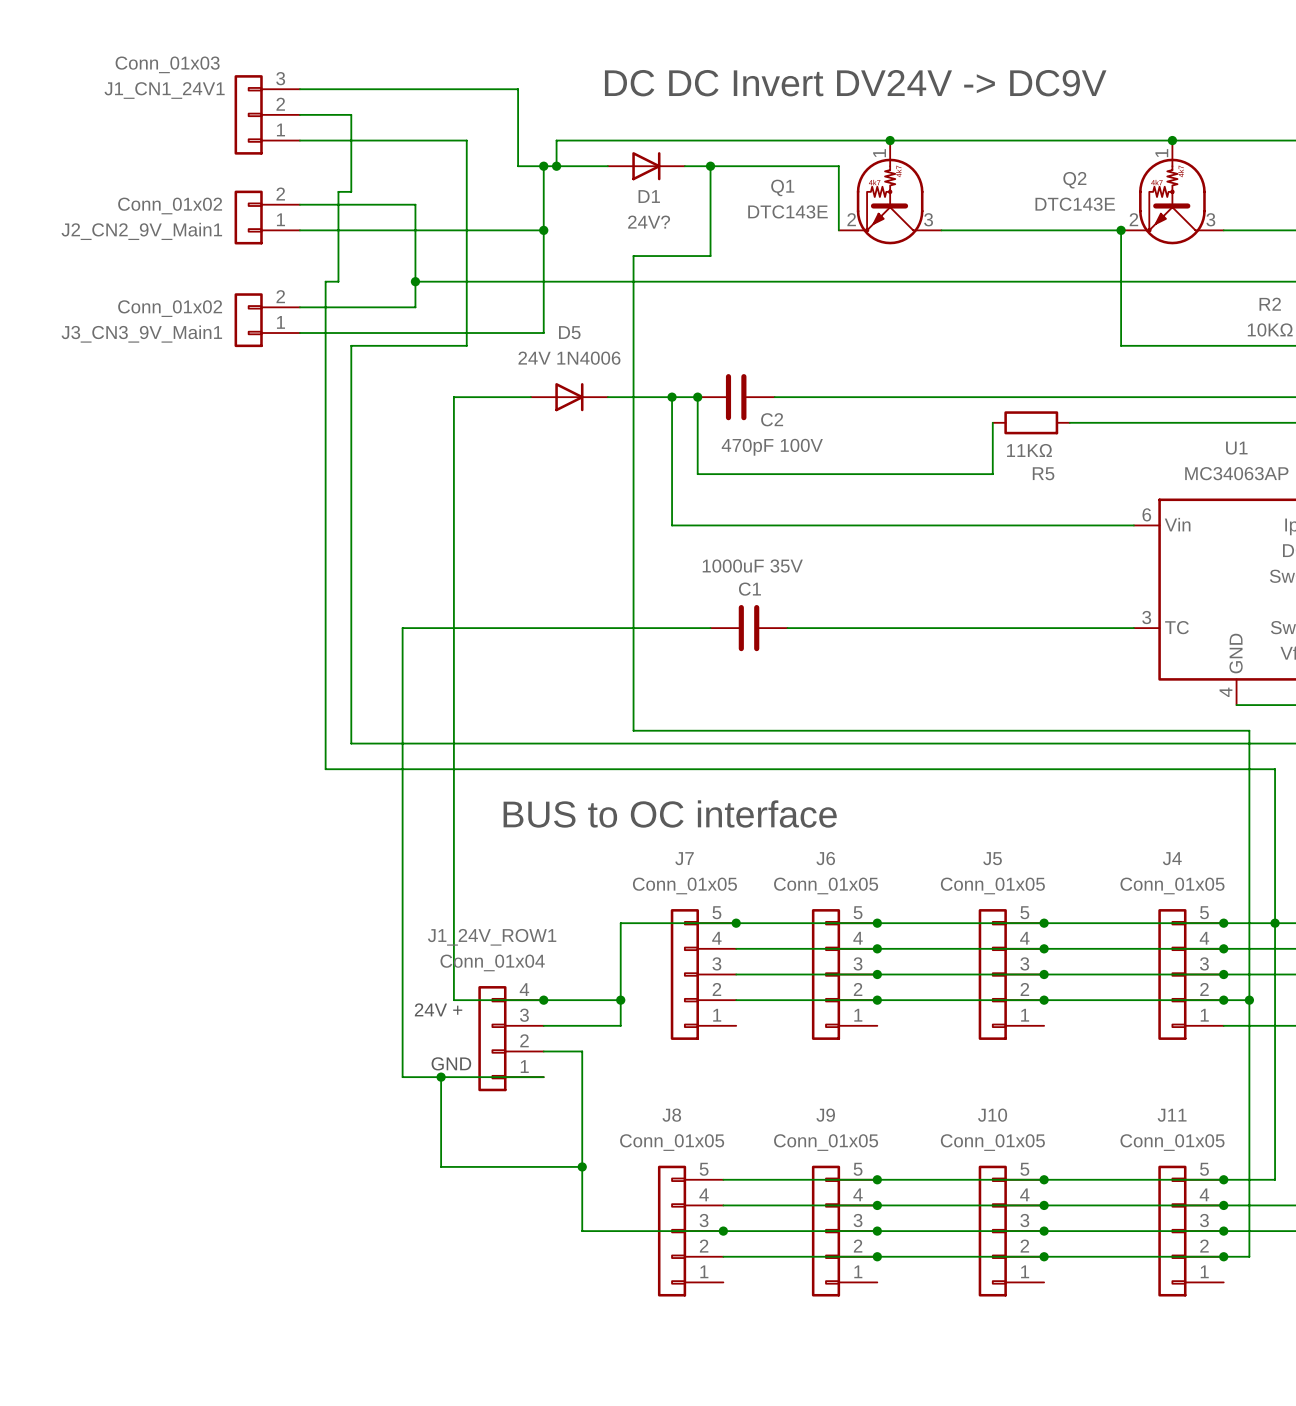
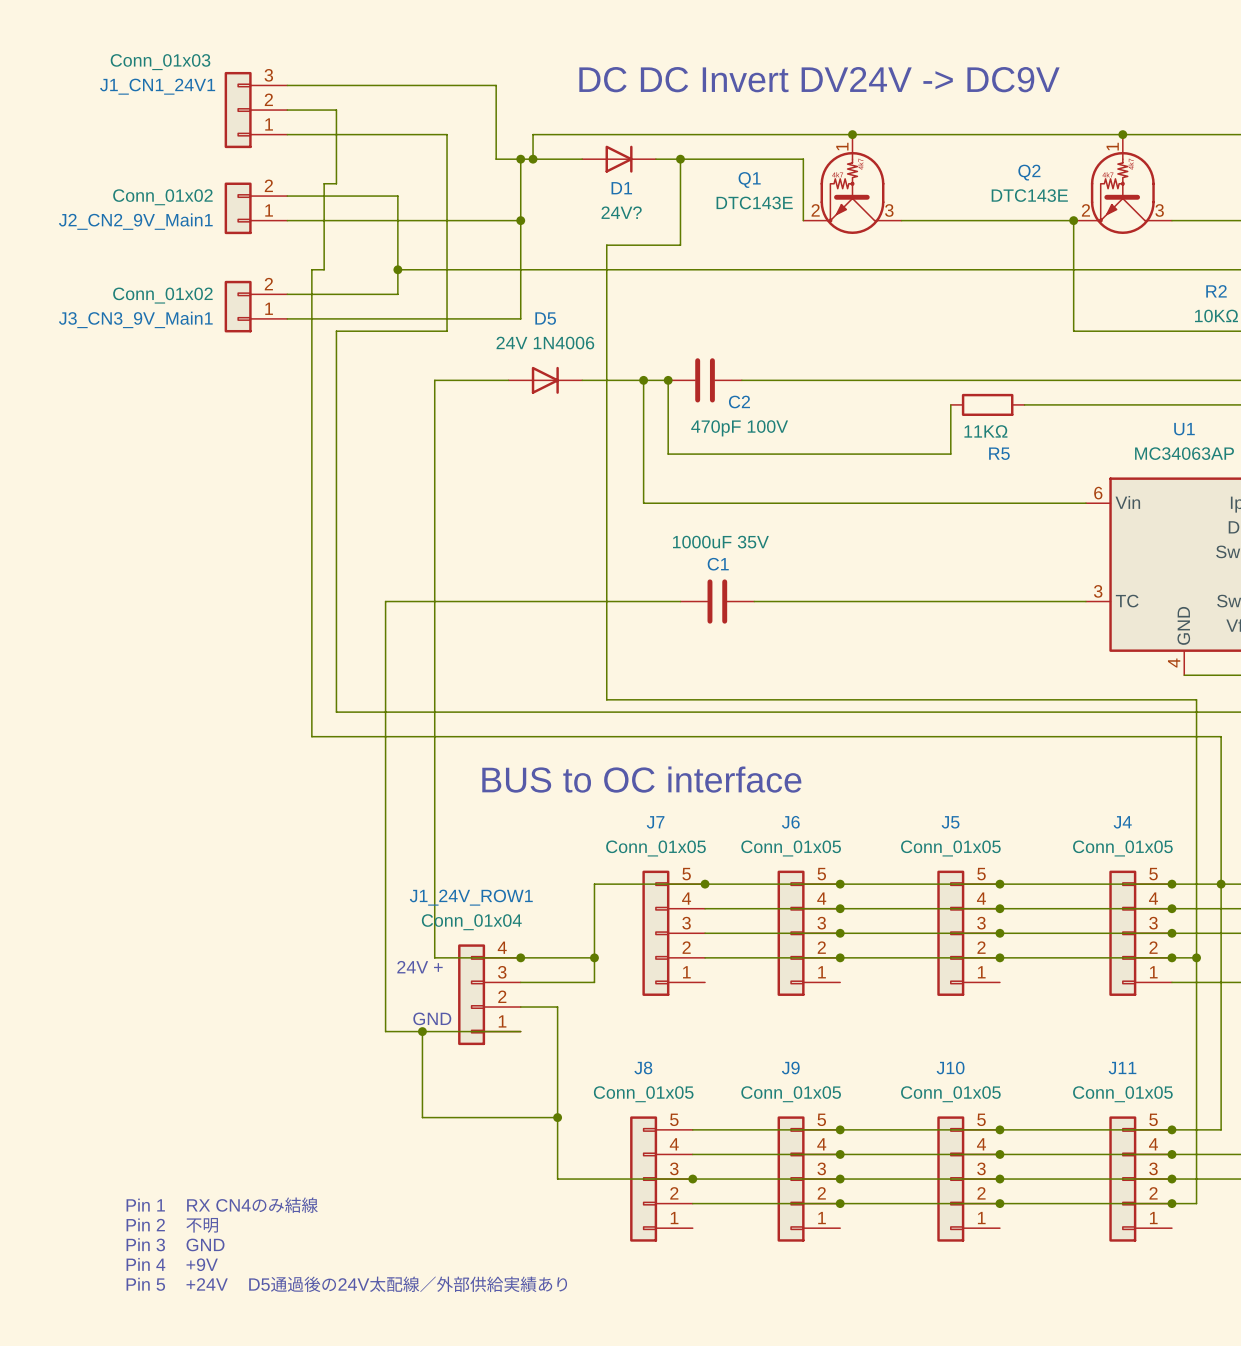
text: none -> Pin 1 RX CN4のみ結線 (222, 1205)
text: none -> Pin 2 不明 (172, 1225)
text: none -> Pin 3 GND (175, 1244)
text: none -> Pin 4 +9V (172, 1264)
text: none -> Pin 5 +24V D5通過後の24V太配線／外部供給実績あり (346, 1284)

